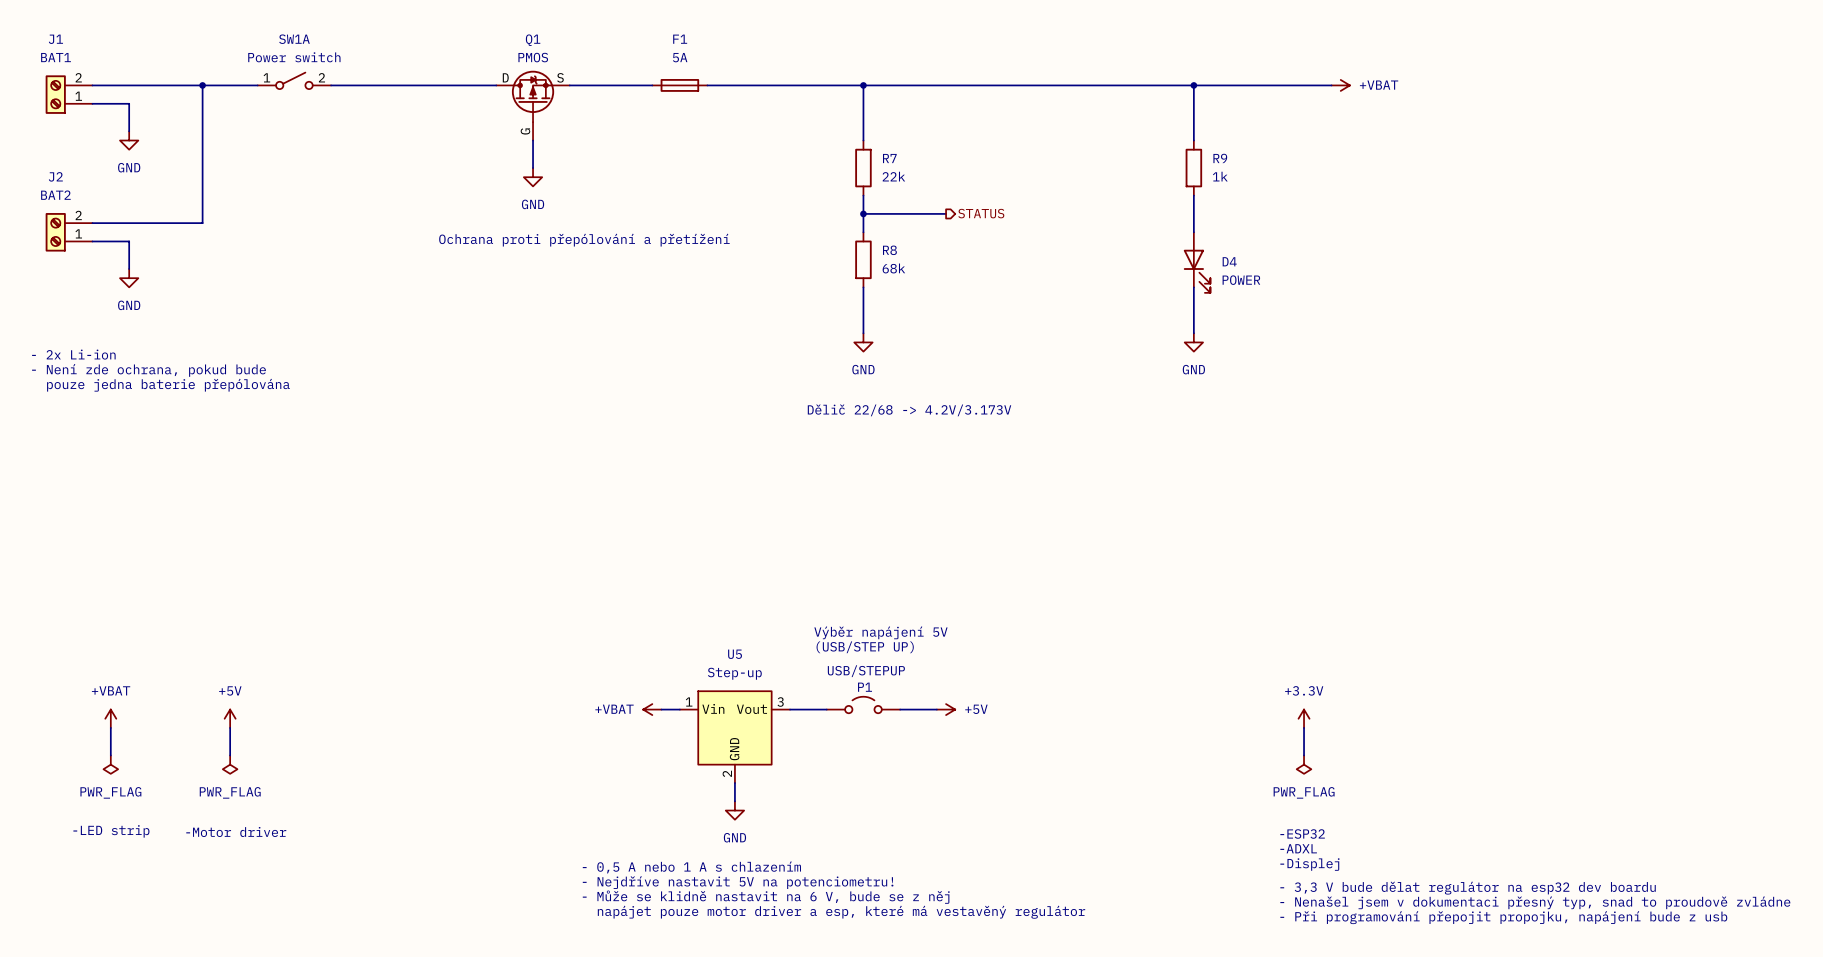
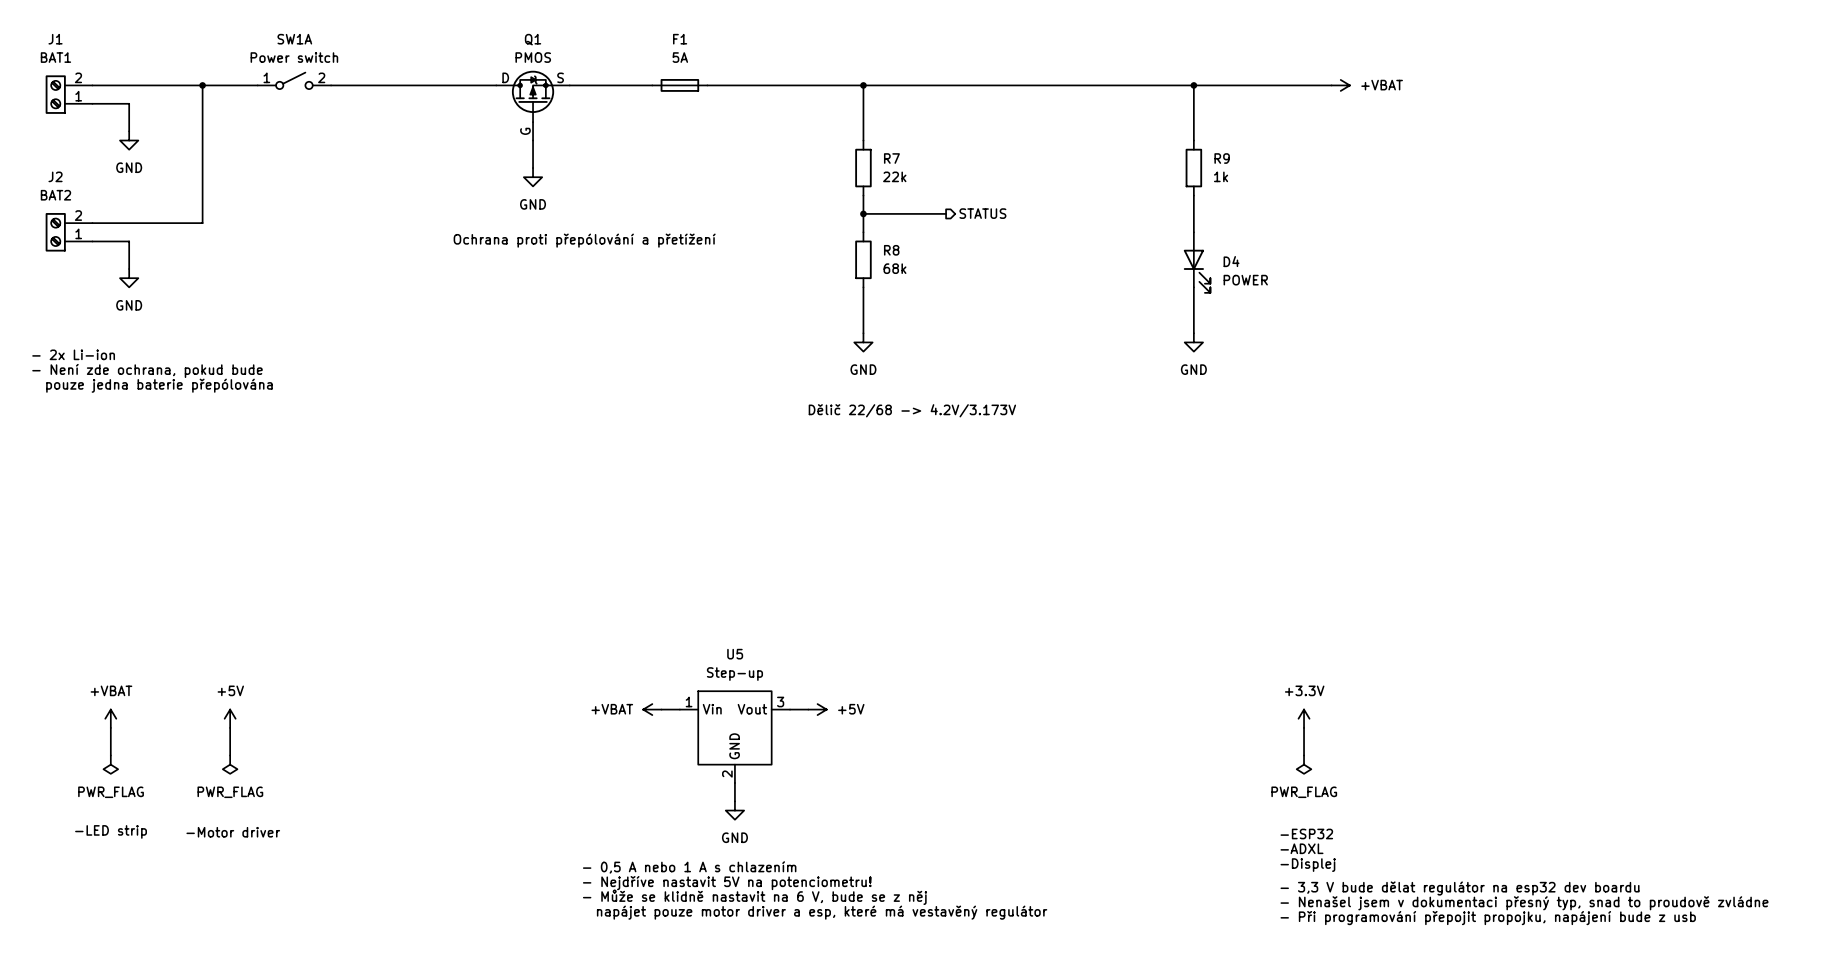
text: Výběr napájení 5V (880, 632) -> none
text: (USB/STEP UP) (865, 647) -> none
P1: USB/STEPUP (863, 704) -> none
wire: (900, 709) (936, 709) -> none
power symbol position: +5V (946, 709) -> +5V (817, 709)

